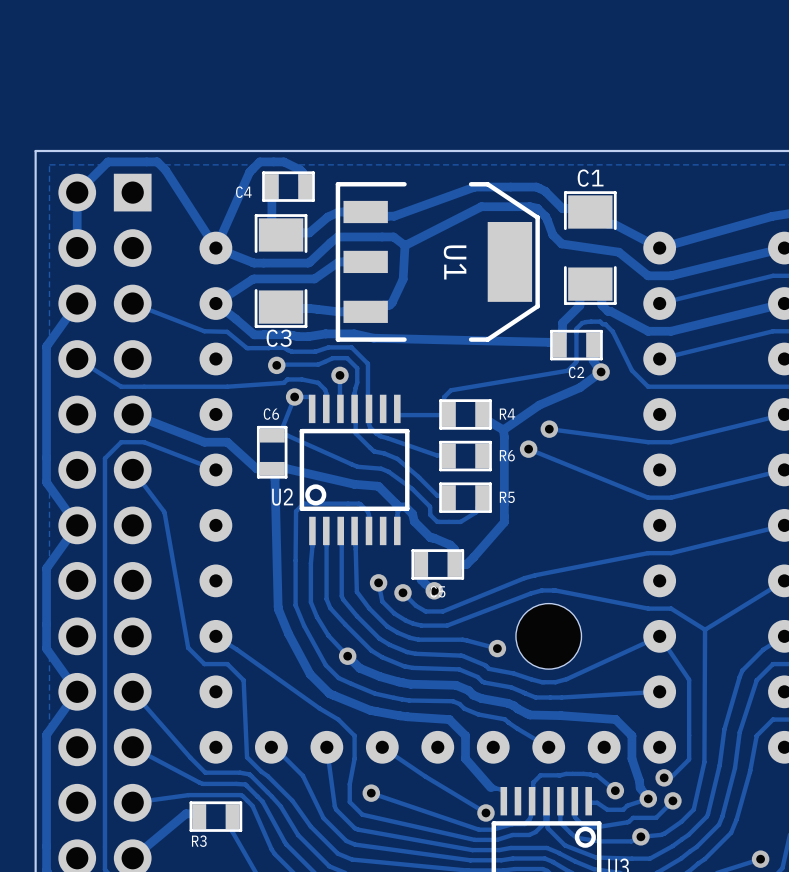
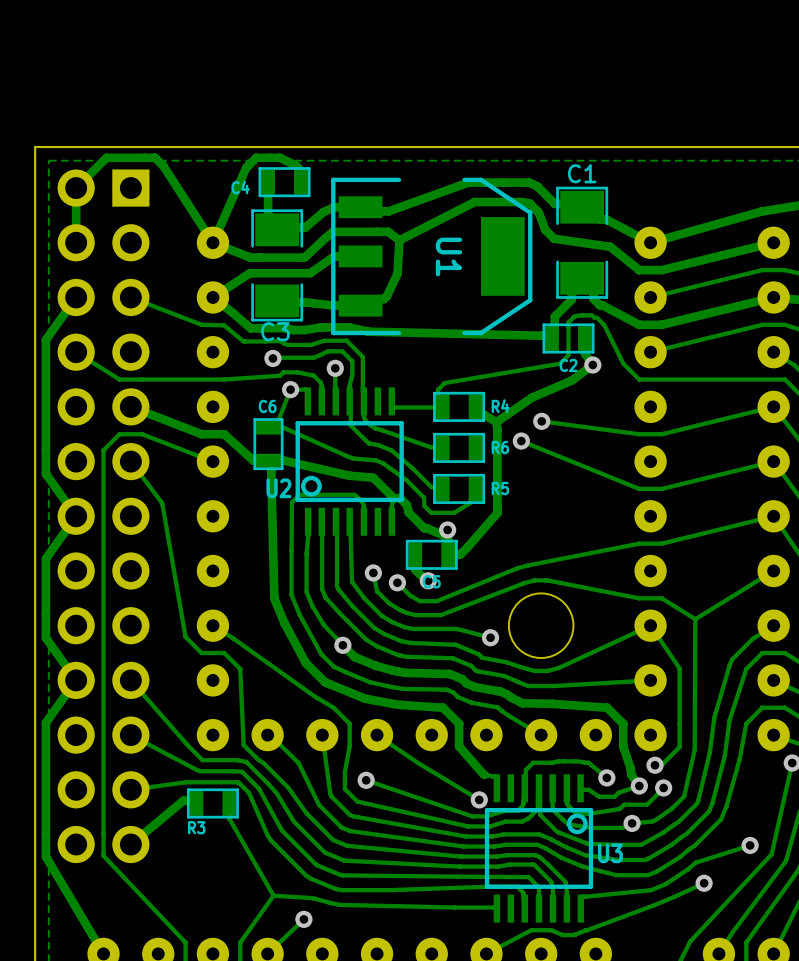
via: none -> (447, 529)

